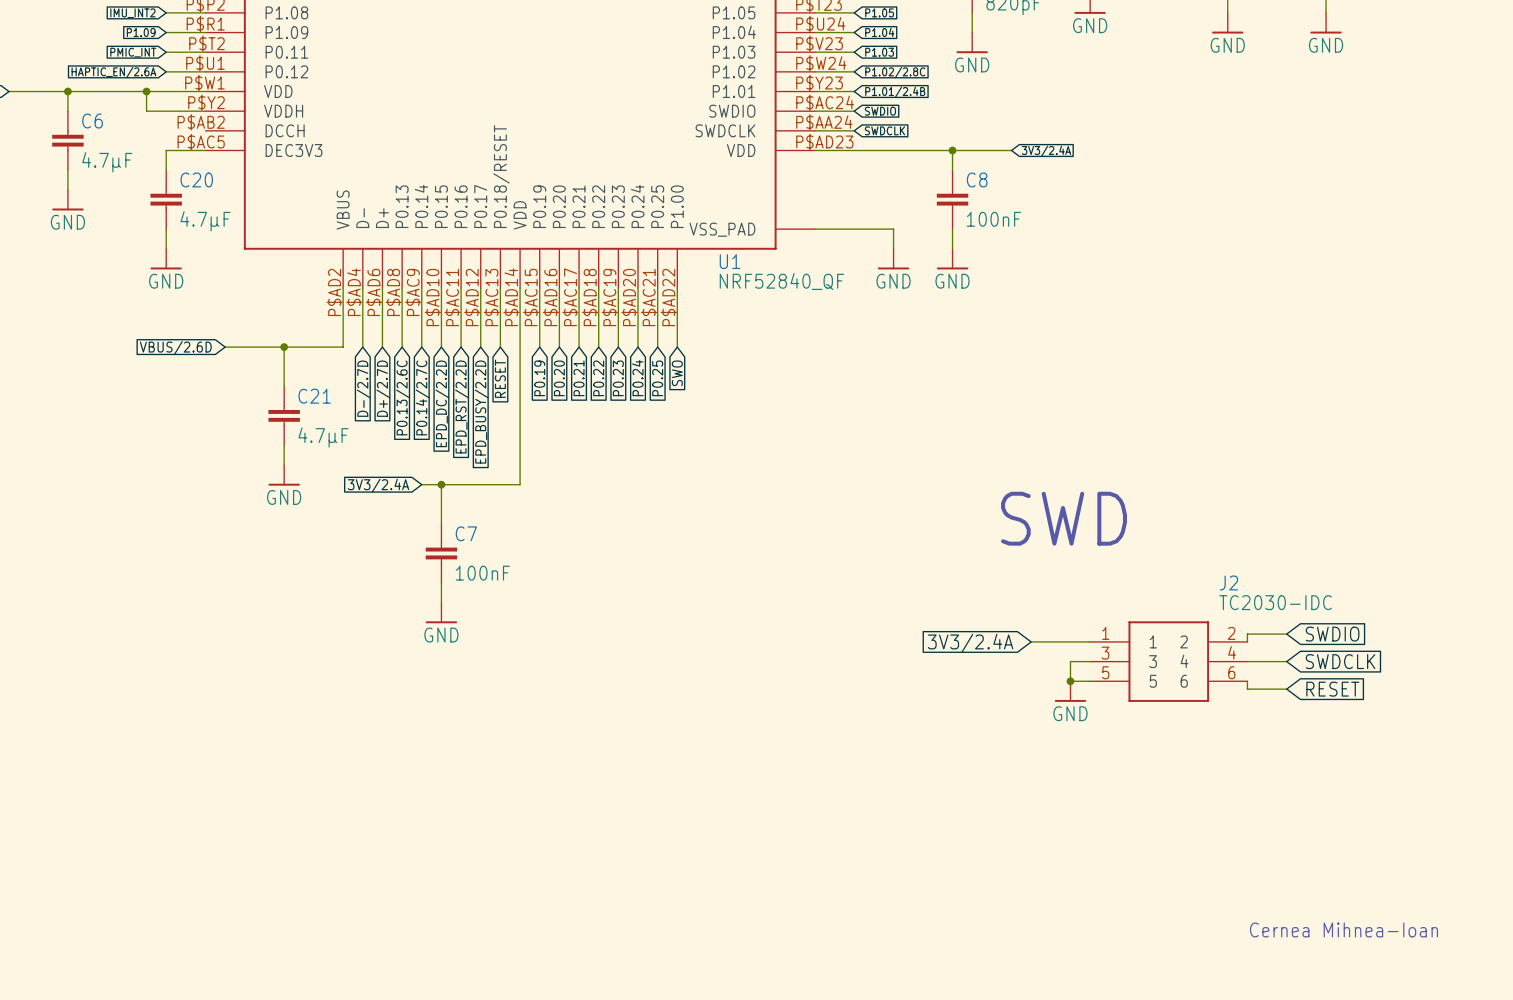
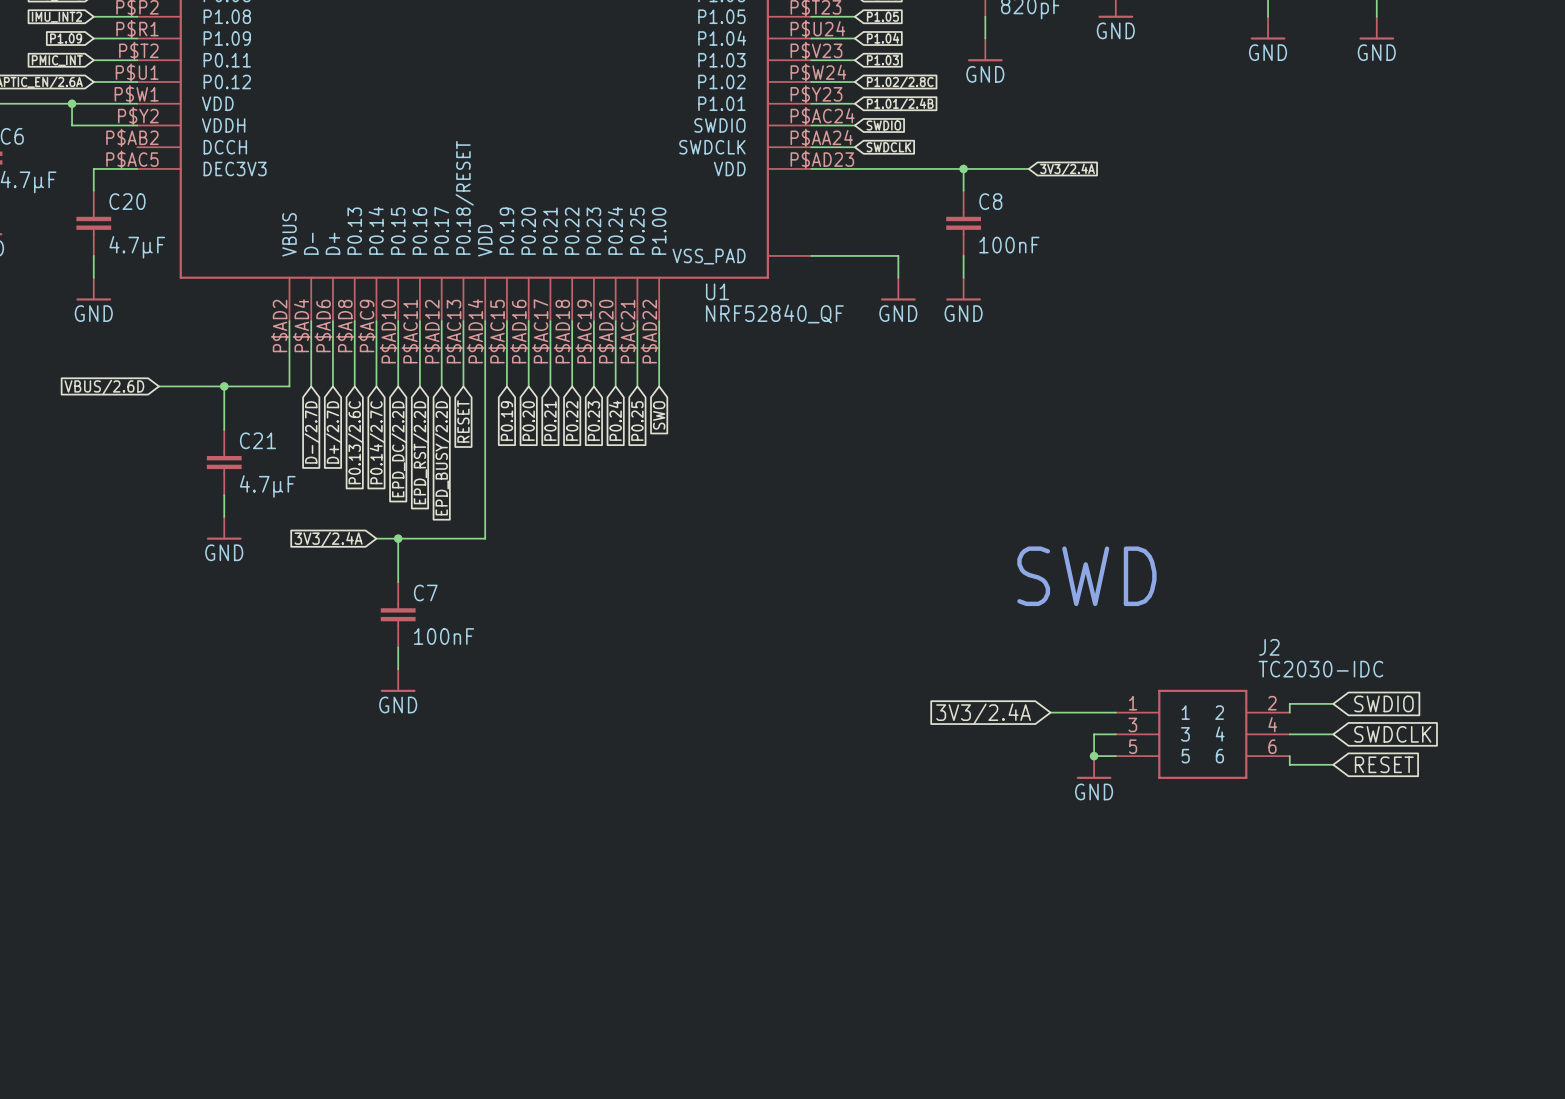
text: Cernea Mihnea-Ioan (1343, 929) -> none

